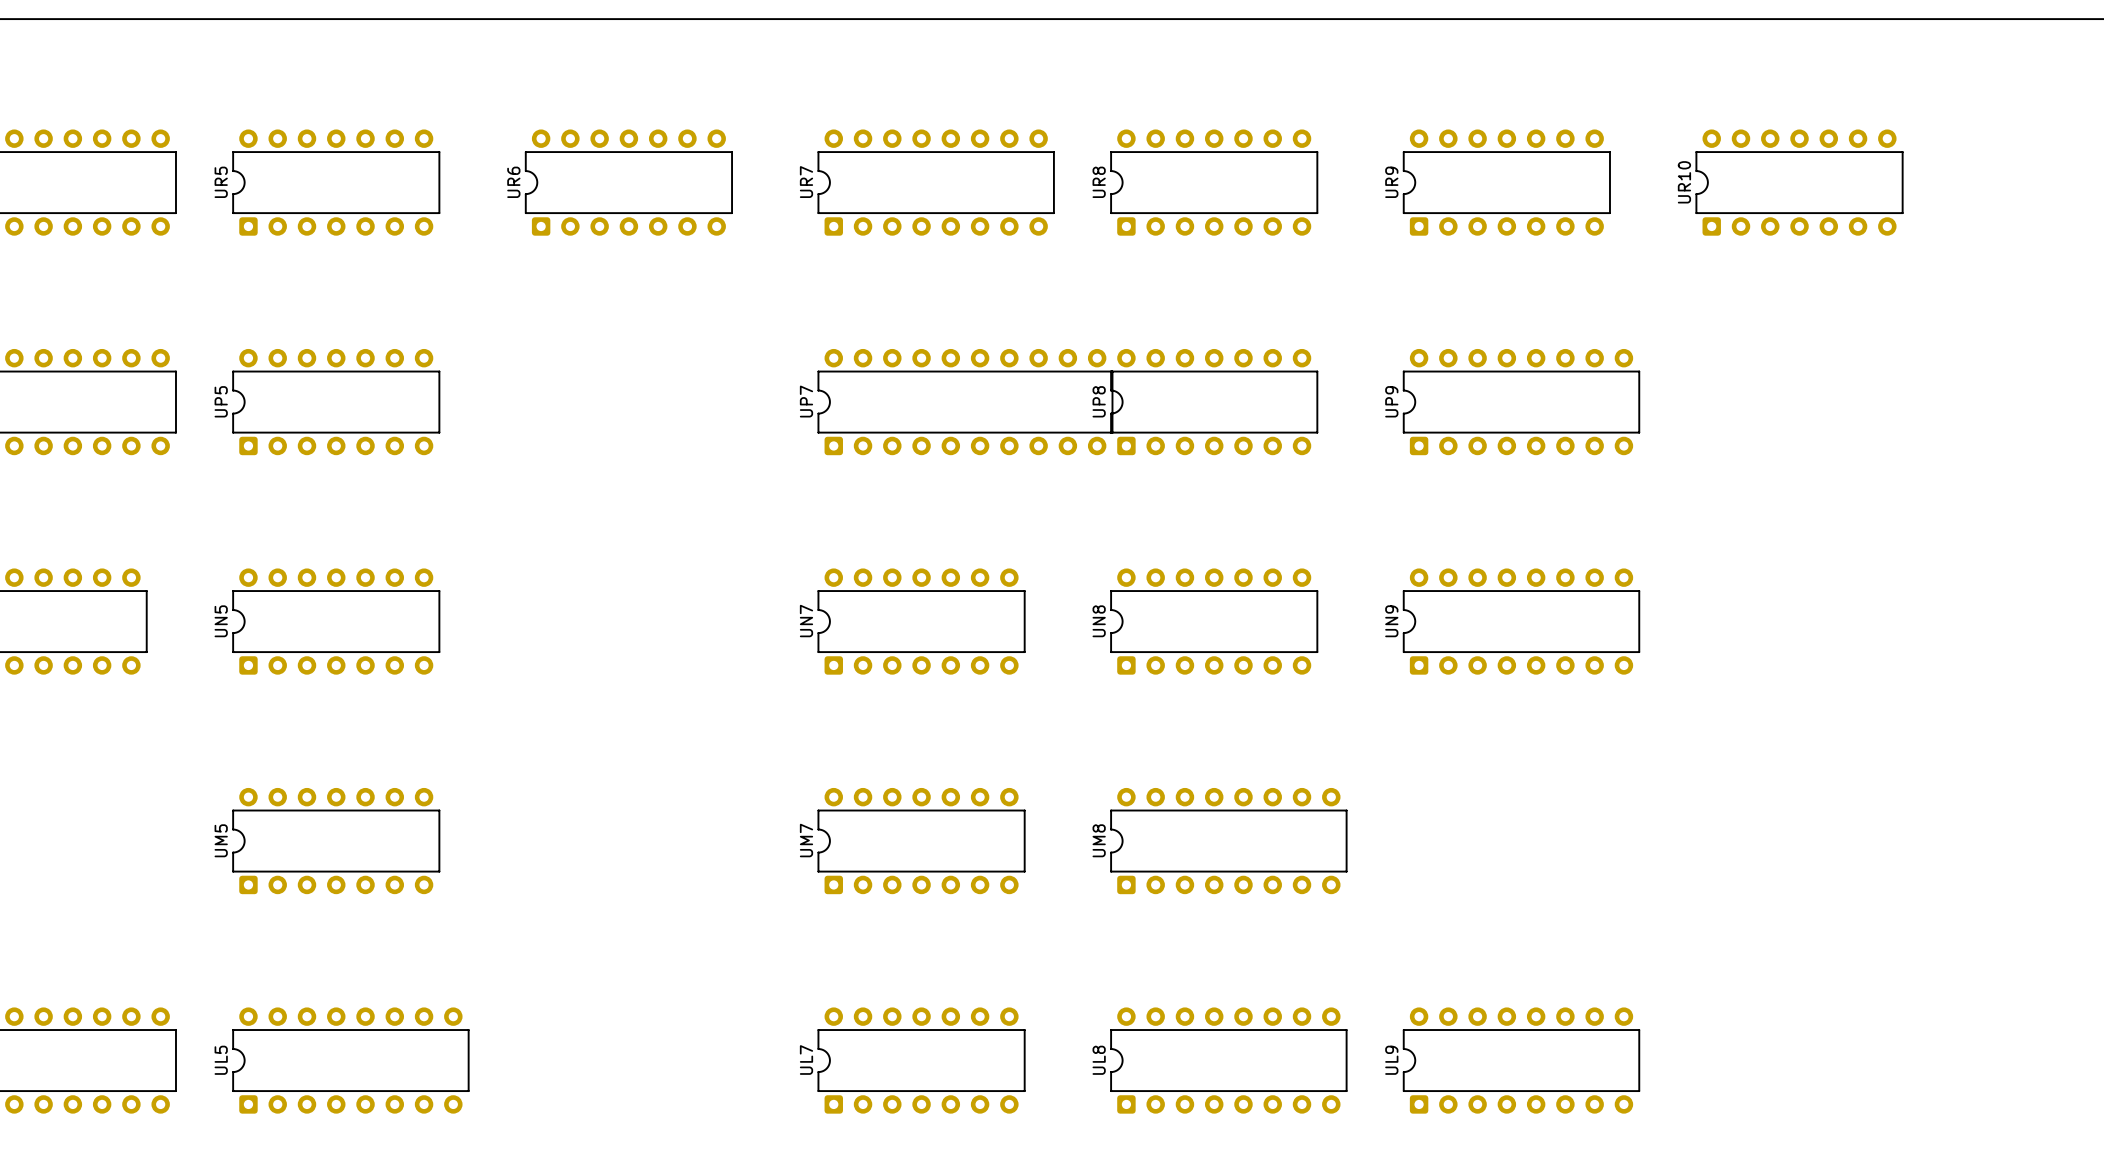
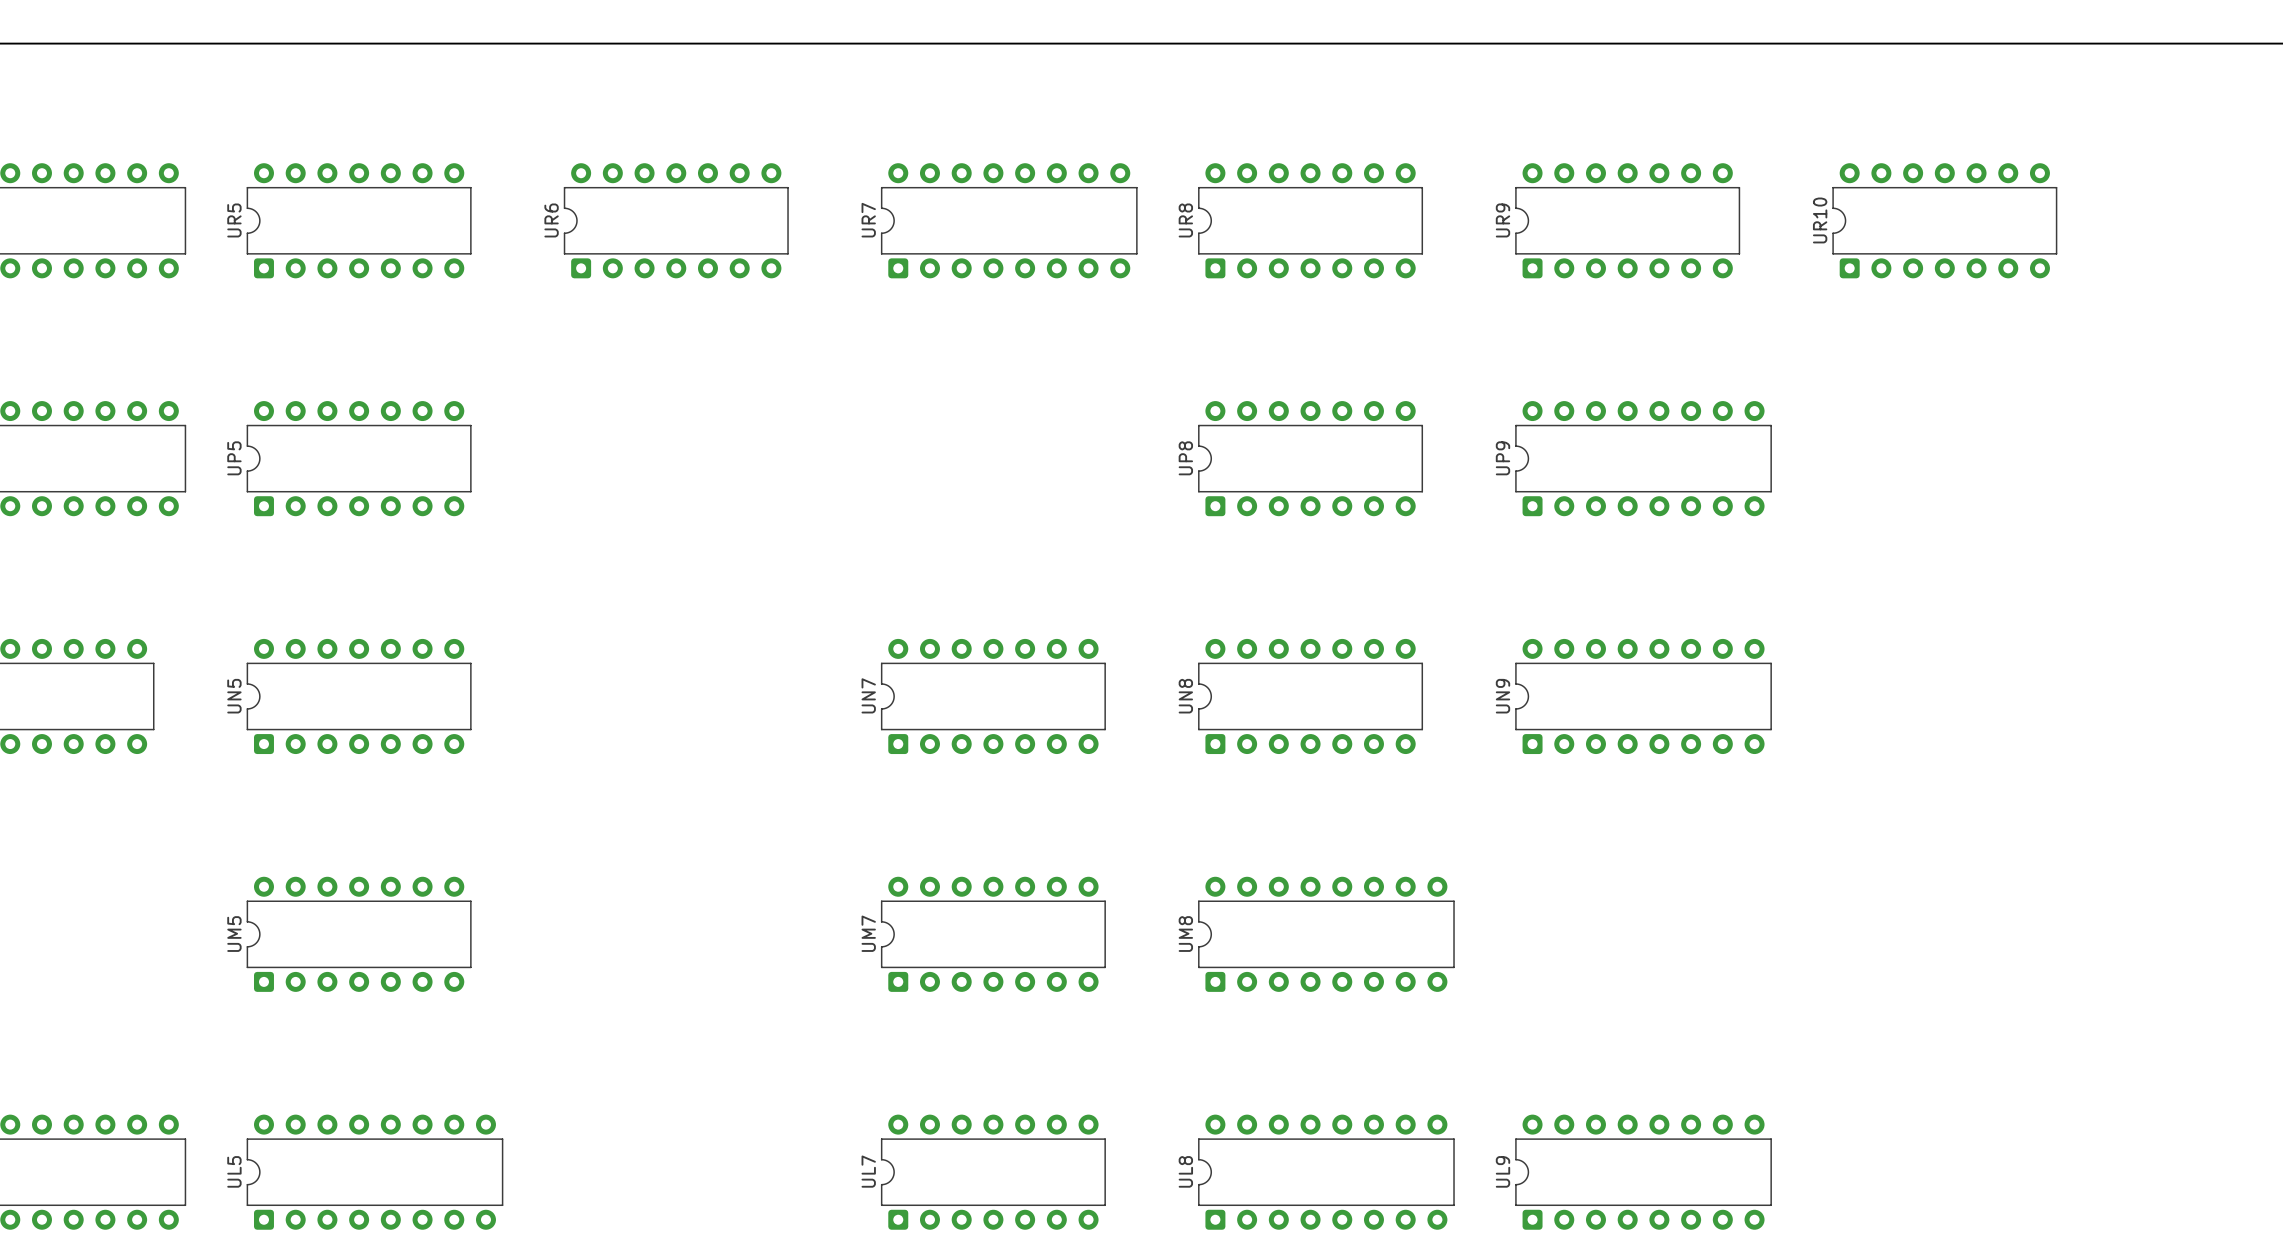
UP7: (965, 402) -> none

